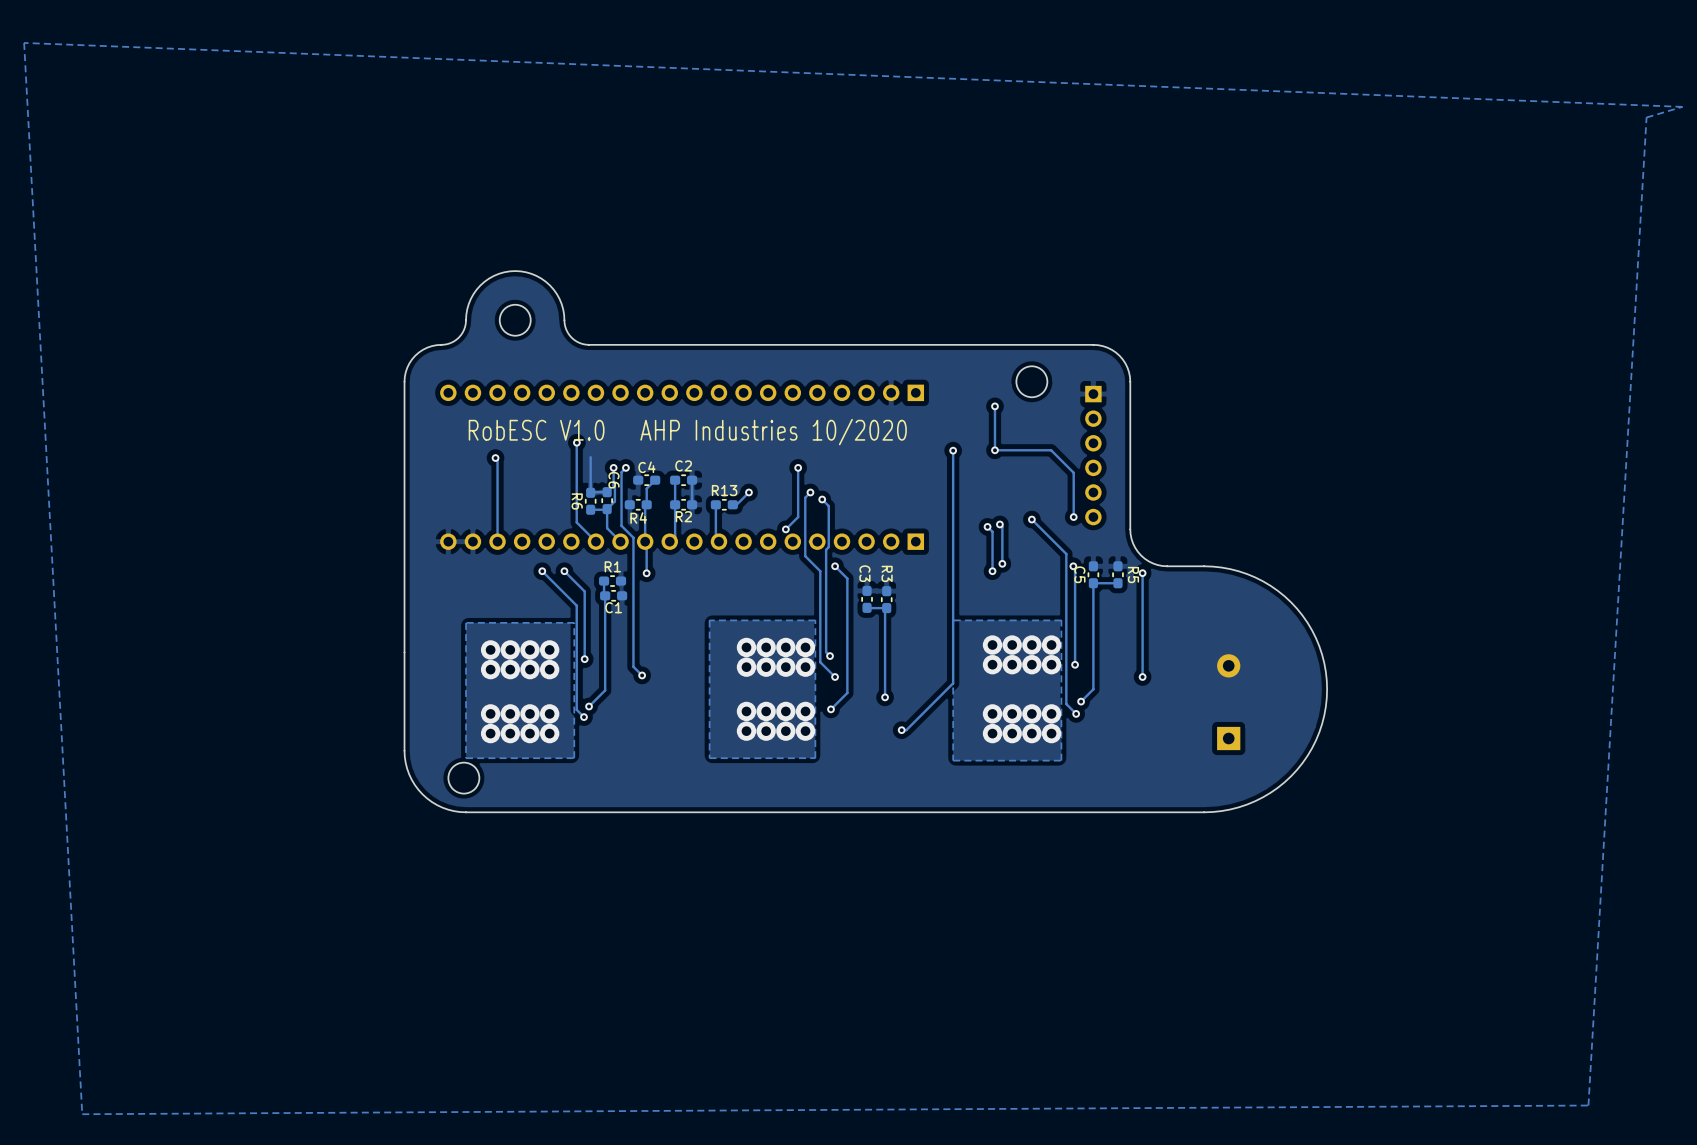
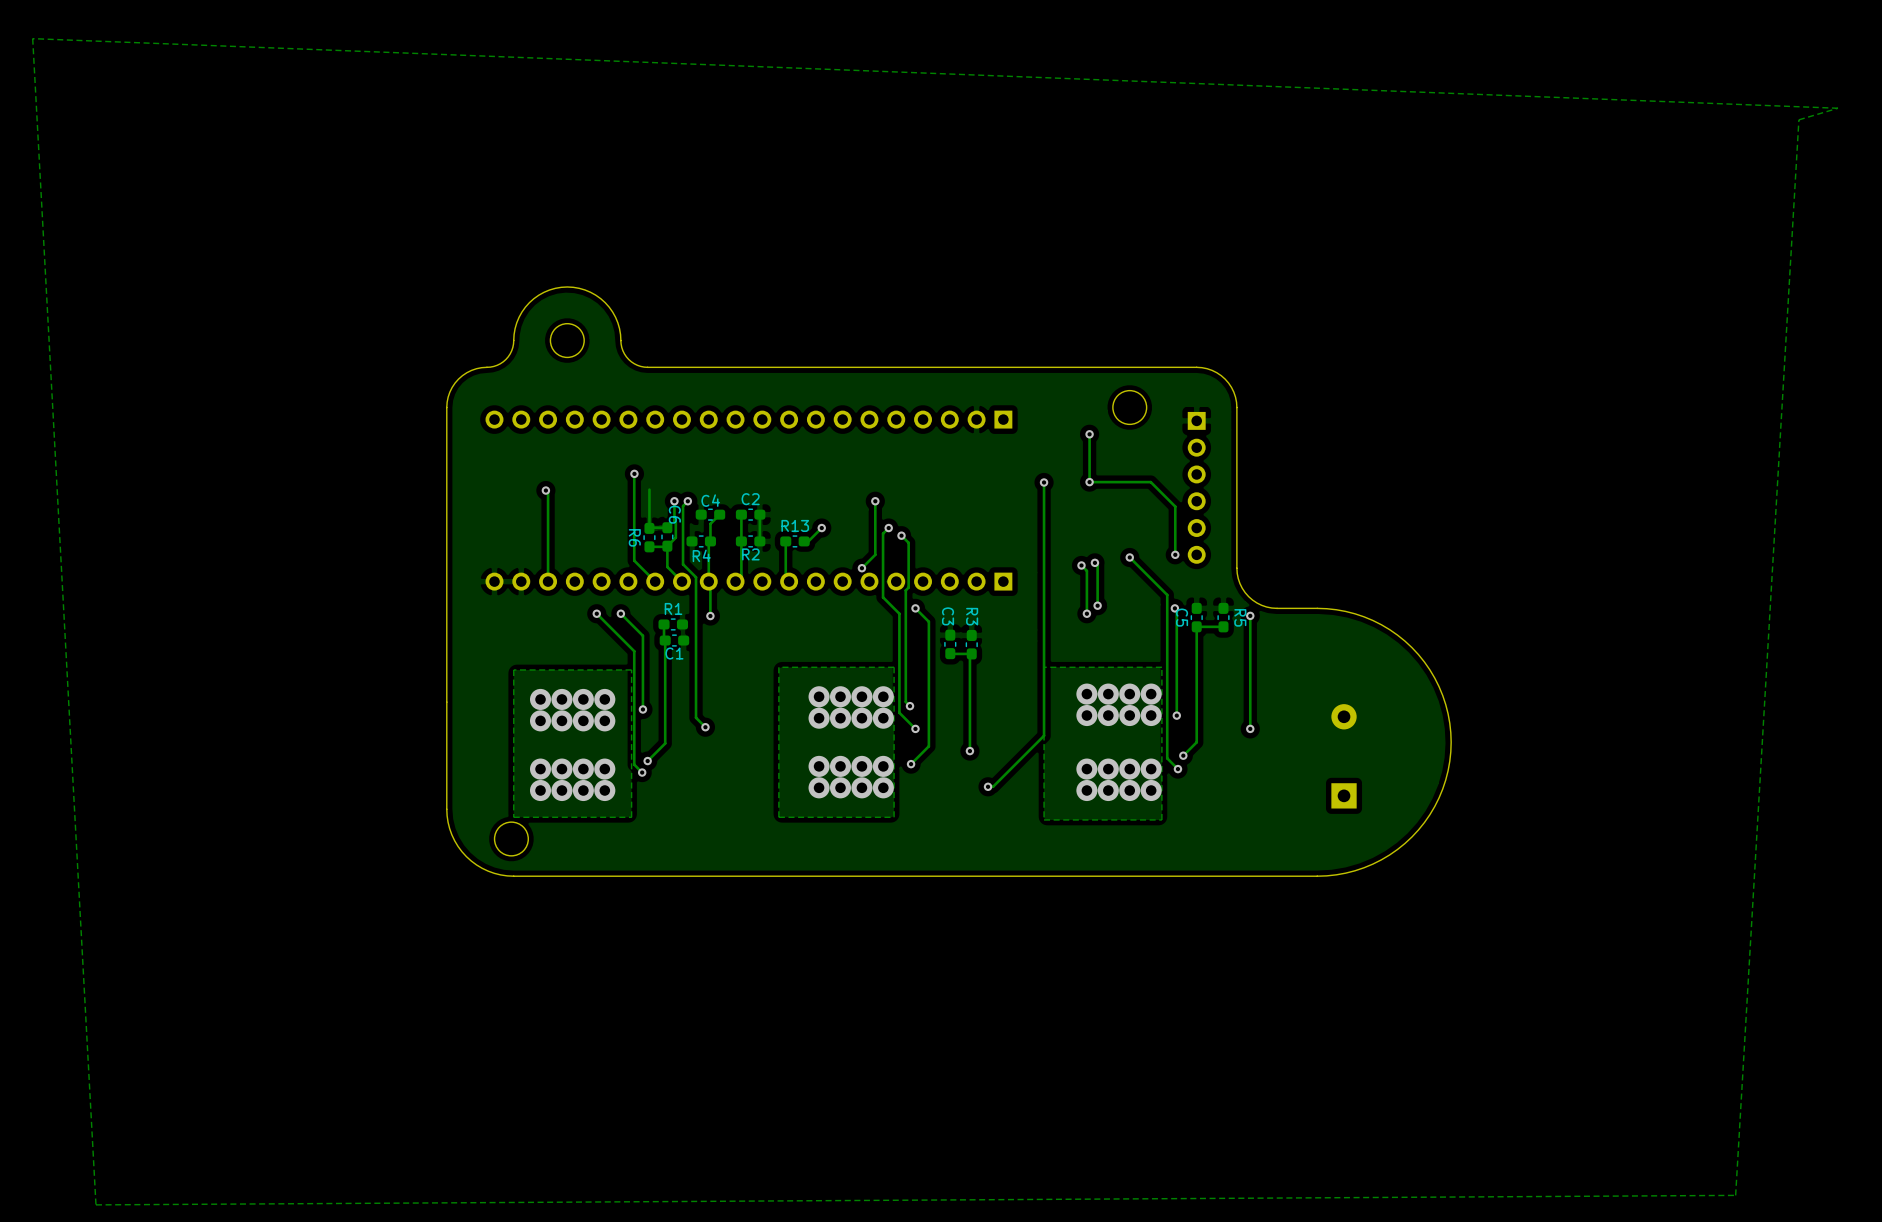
text: RobESC V1.0 AHP Industries 10/2020 (687, 432) -> none

